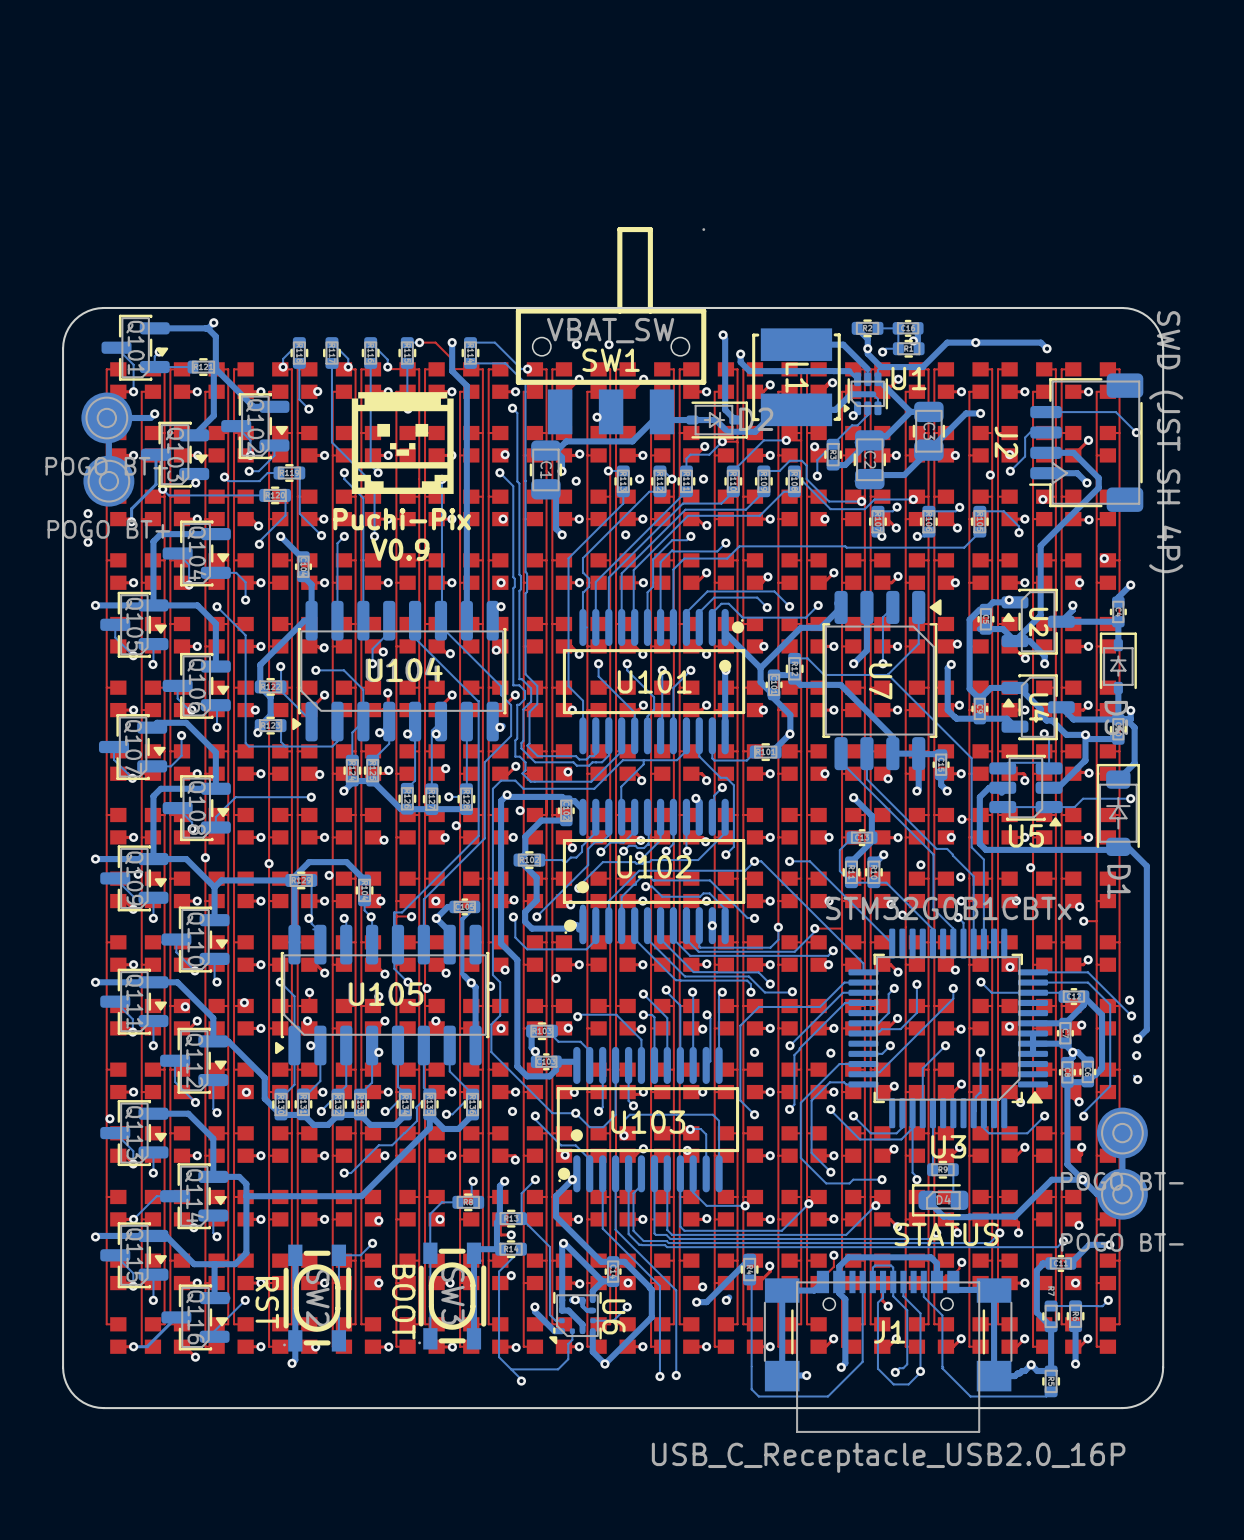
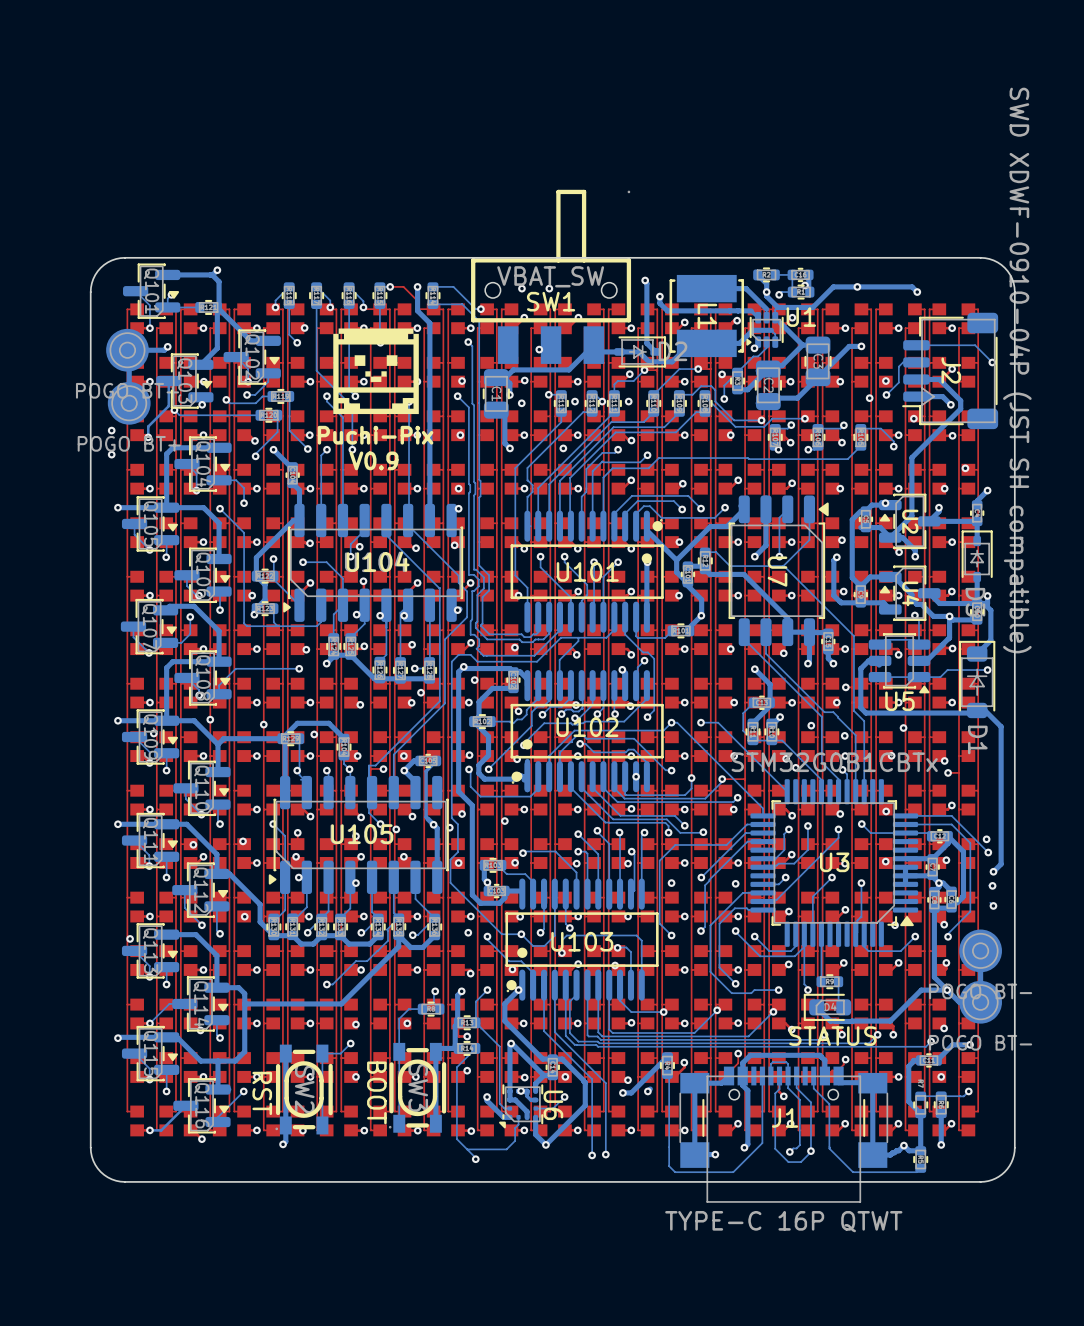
J2 name position: J2 (1006, 442) -> J2 (951, 370)
J2 value: SWD (JST SH 4P) (1166, 442) -> SWD XDWF-0910-04P (JST SH compatible) (1017, 370)
U3 name position: U3 (948, 1146) -> U3 (834, 862)
J1 value: USB_C_Receptacle_USB2.0_16P (888, 1457) -> TYPE-C 16P QTWT (783, 1221)

